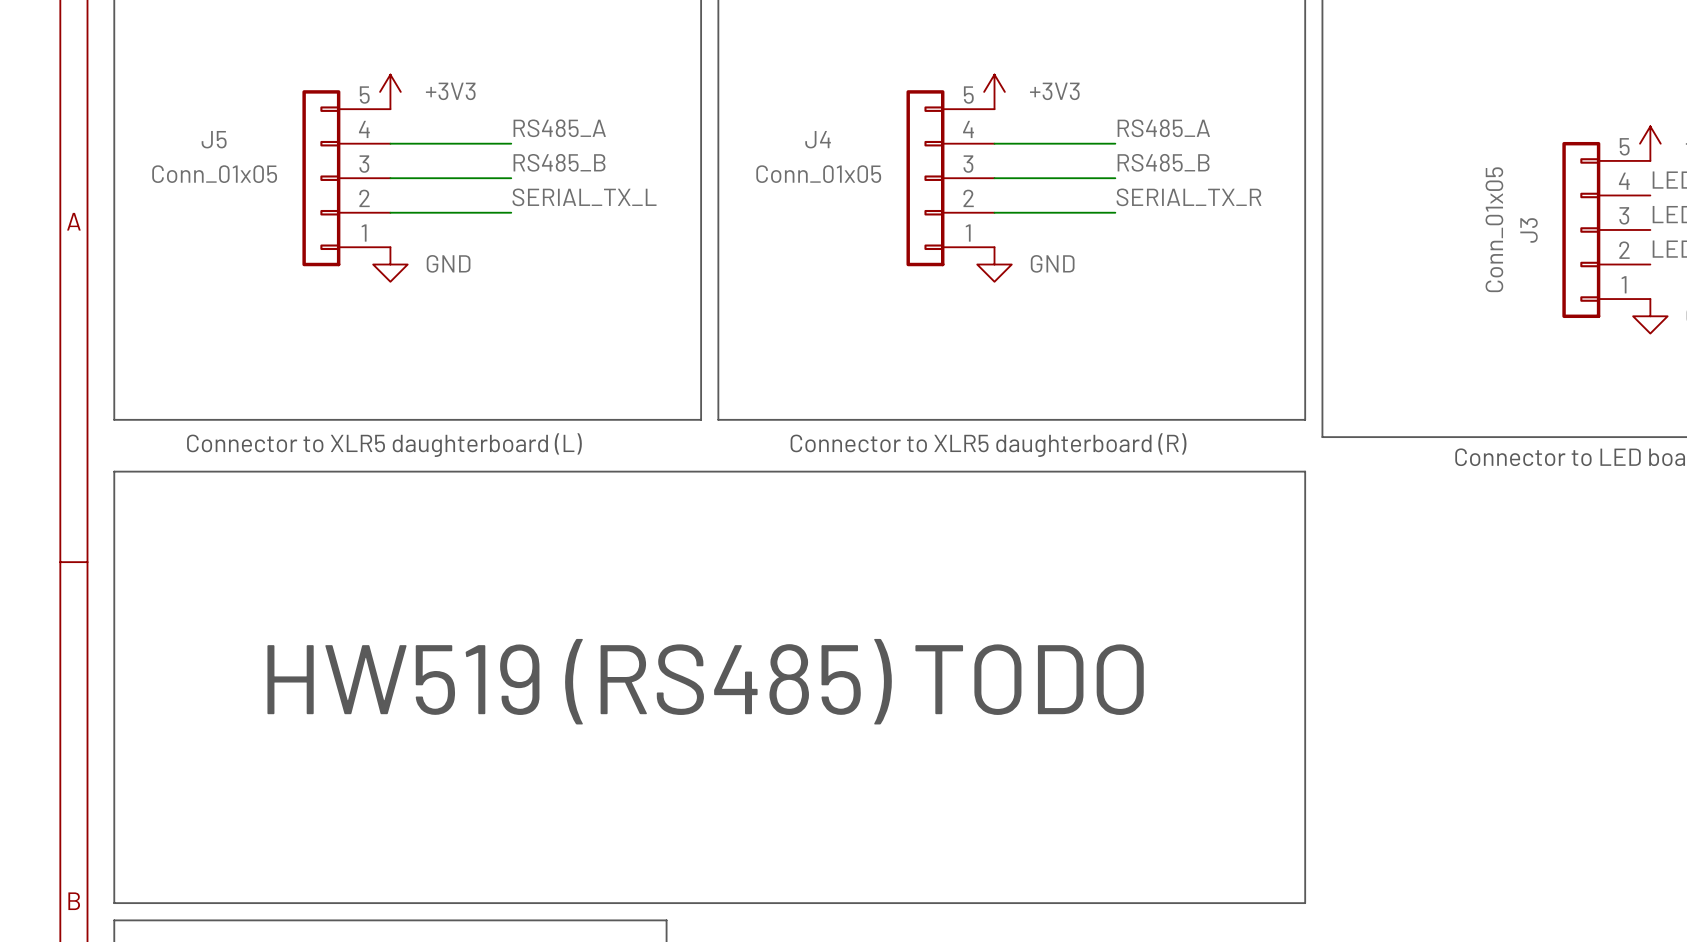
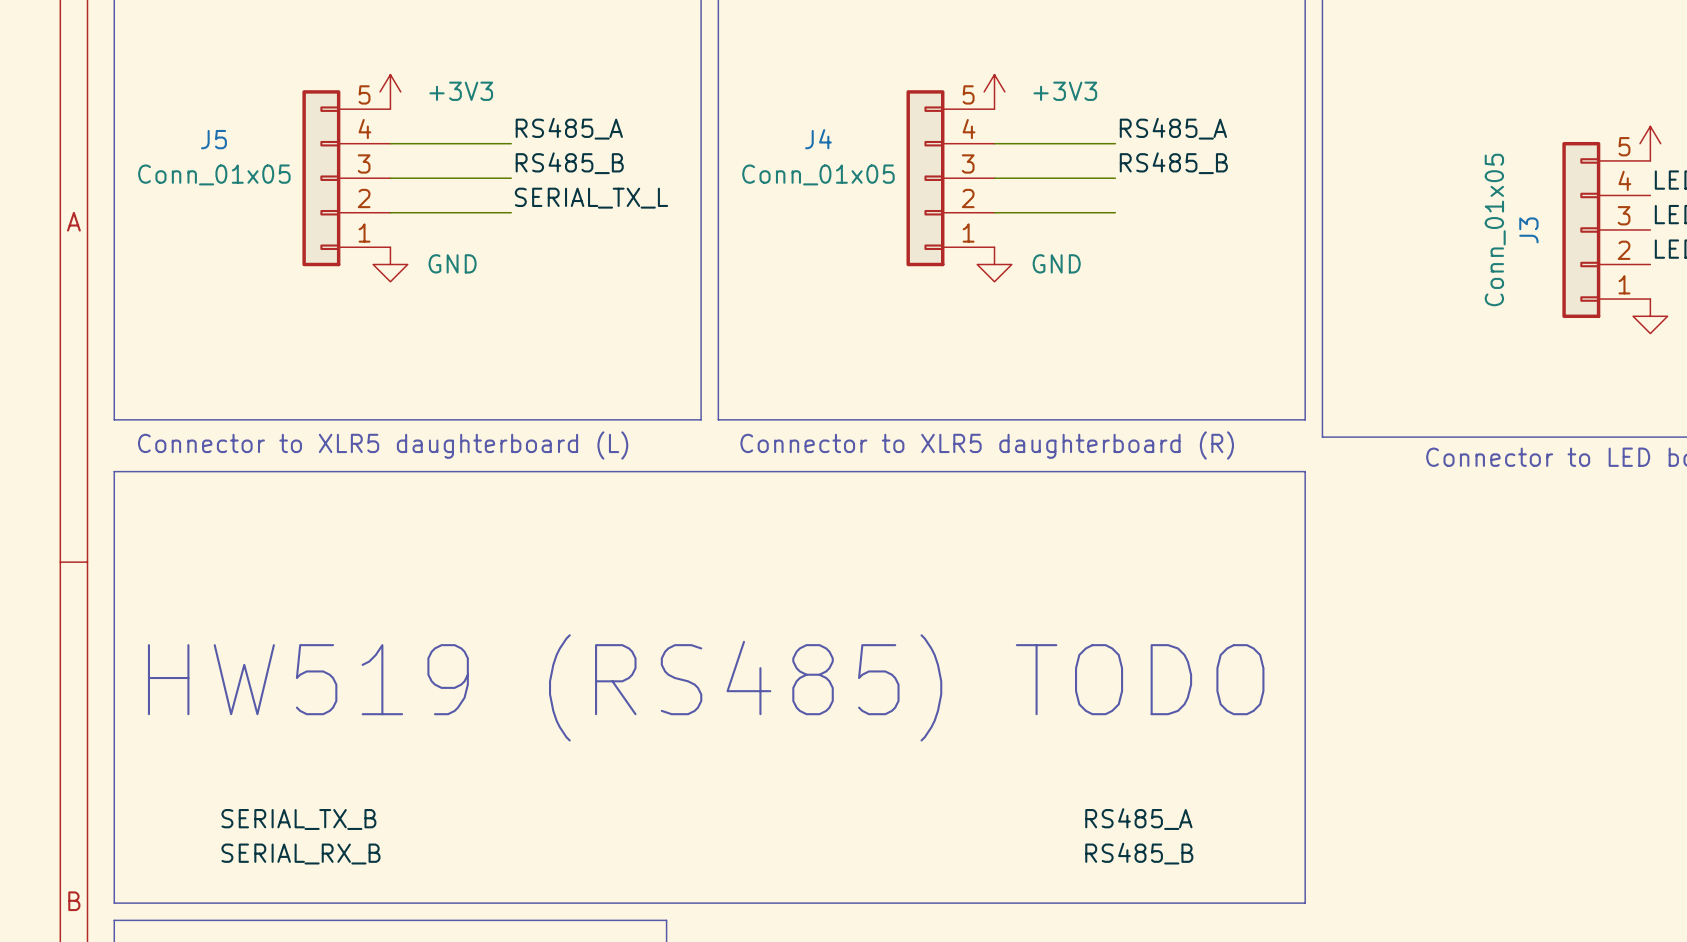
label: SERIAL_TX_R (1188, 197) -> none
label: none -> SERIAL_TX_B (298, 819)
label: none -> RS485_A (1138, 819)
label: none -> SERIAL_RX_B (300, 854)
label: none -> RS485_B (1139, 853)

